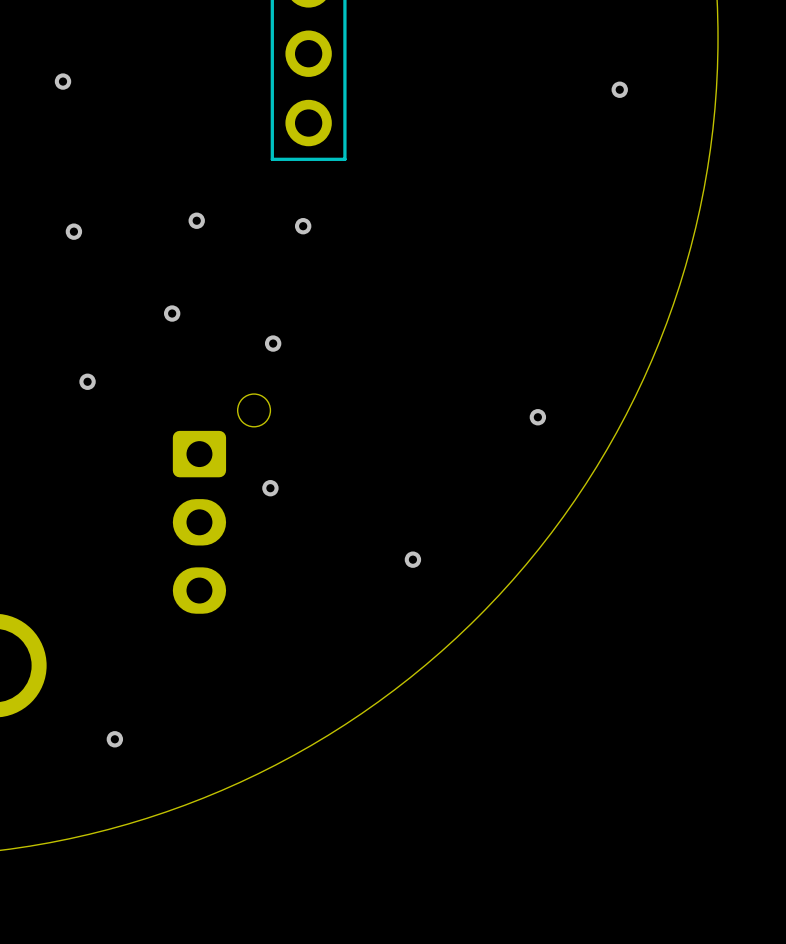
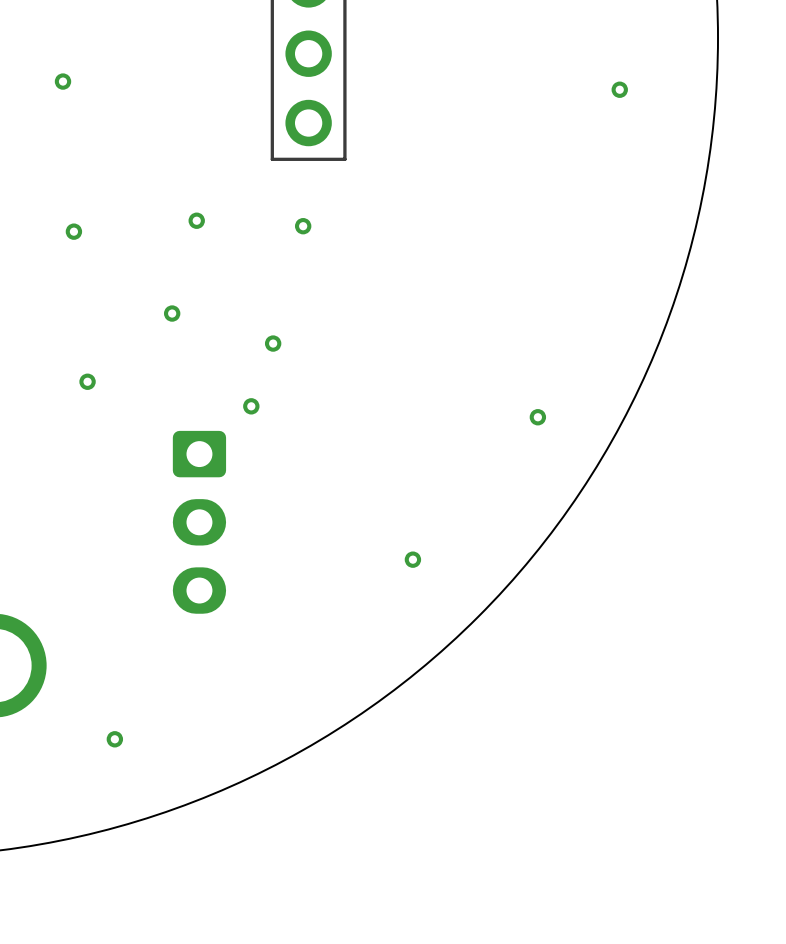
via position: (270, 488) -> (251, 406)
part: (221, 503) -> none

